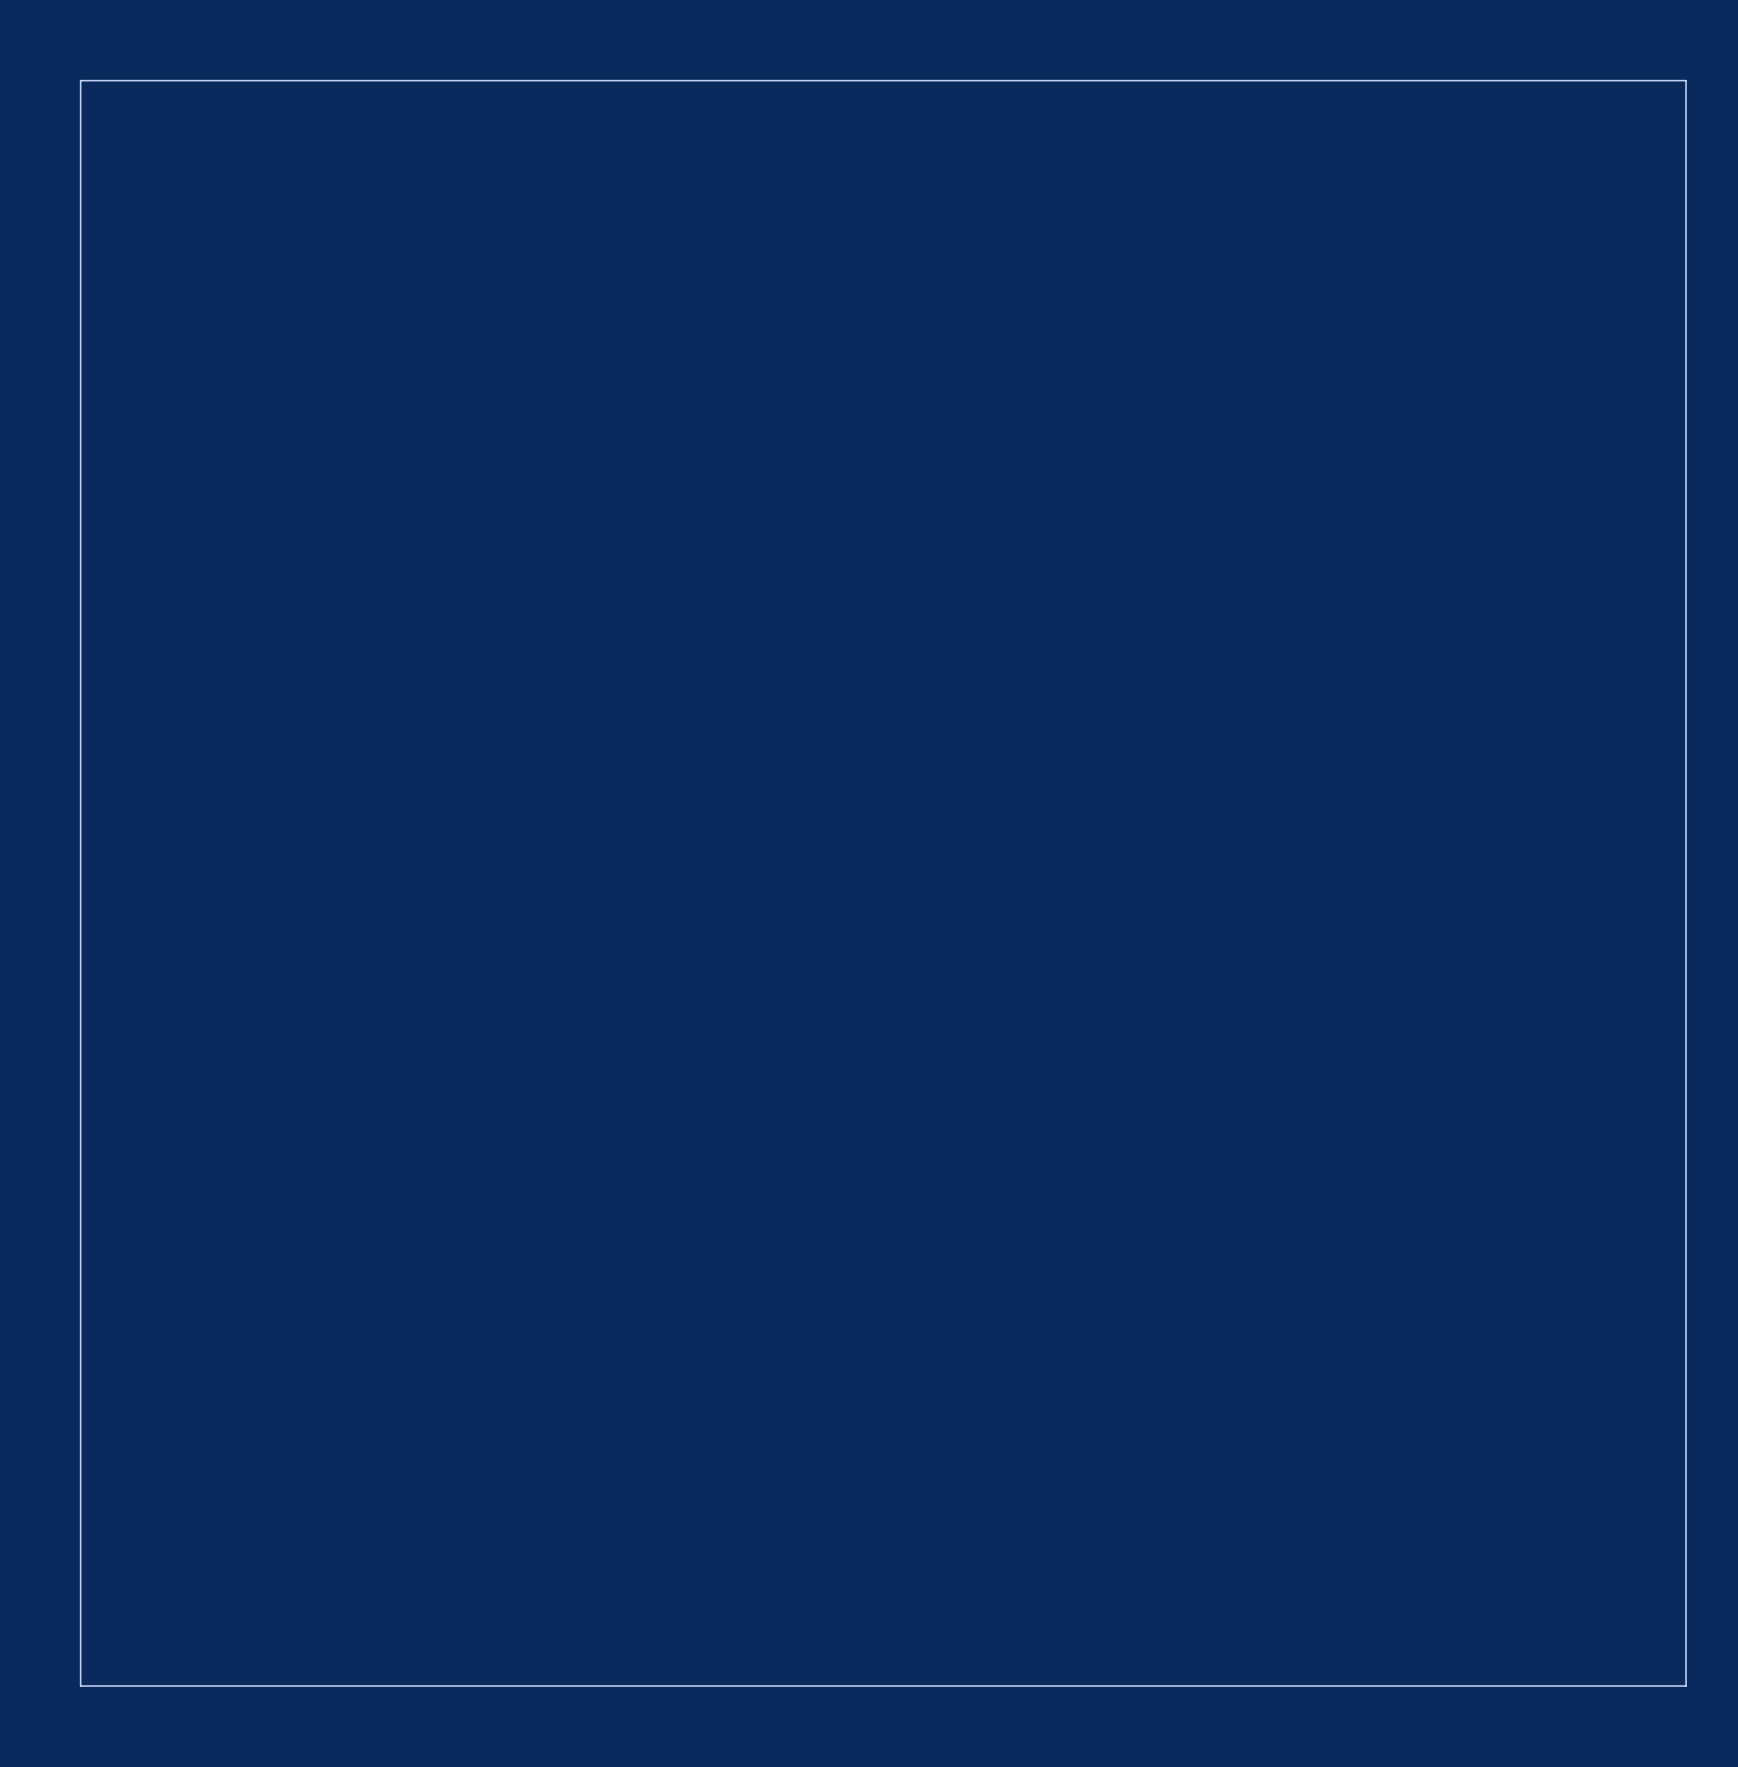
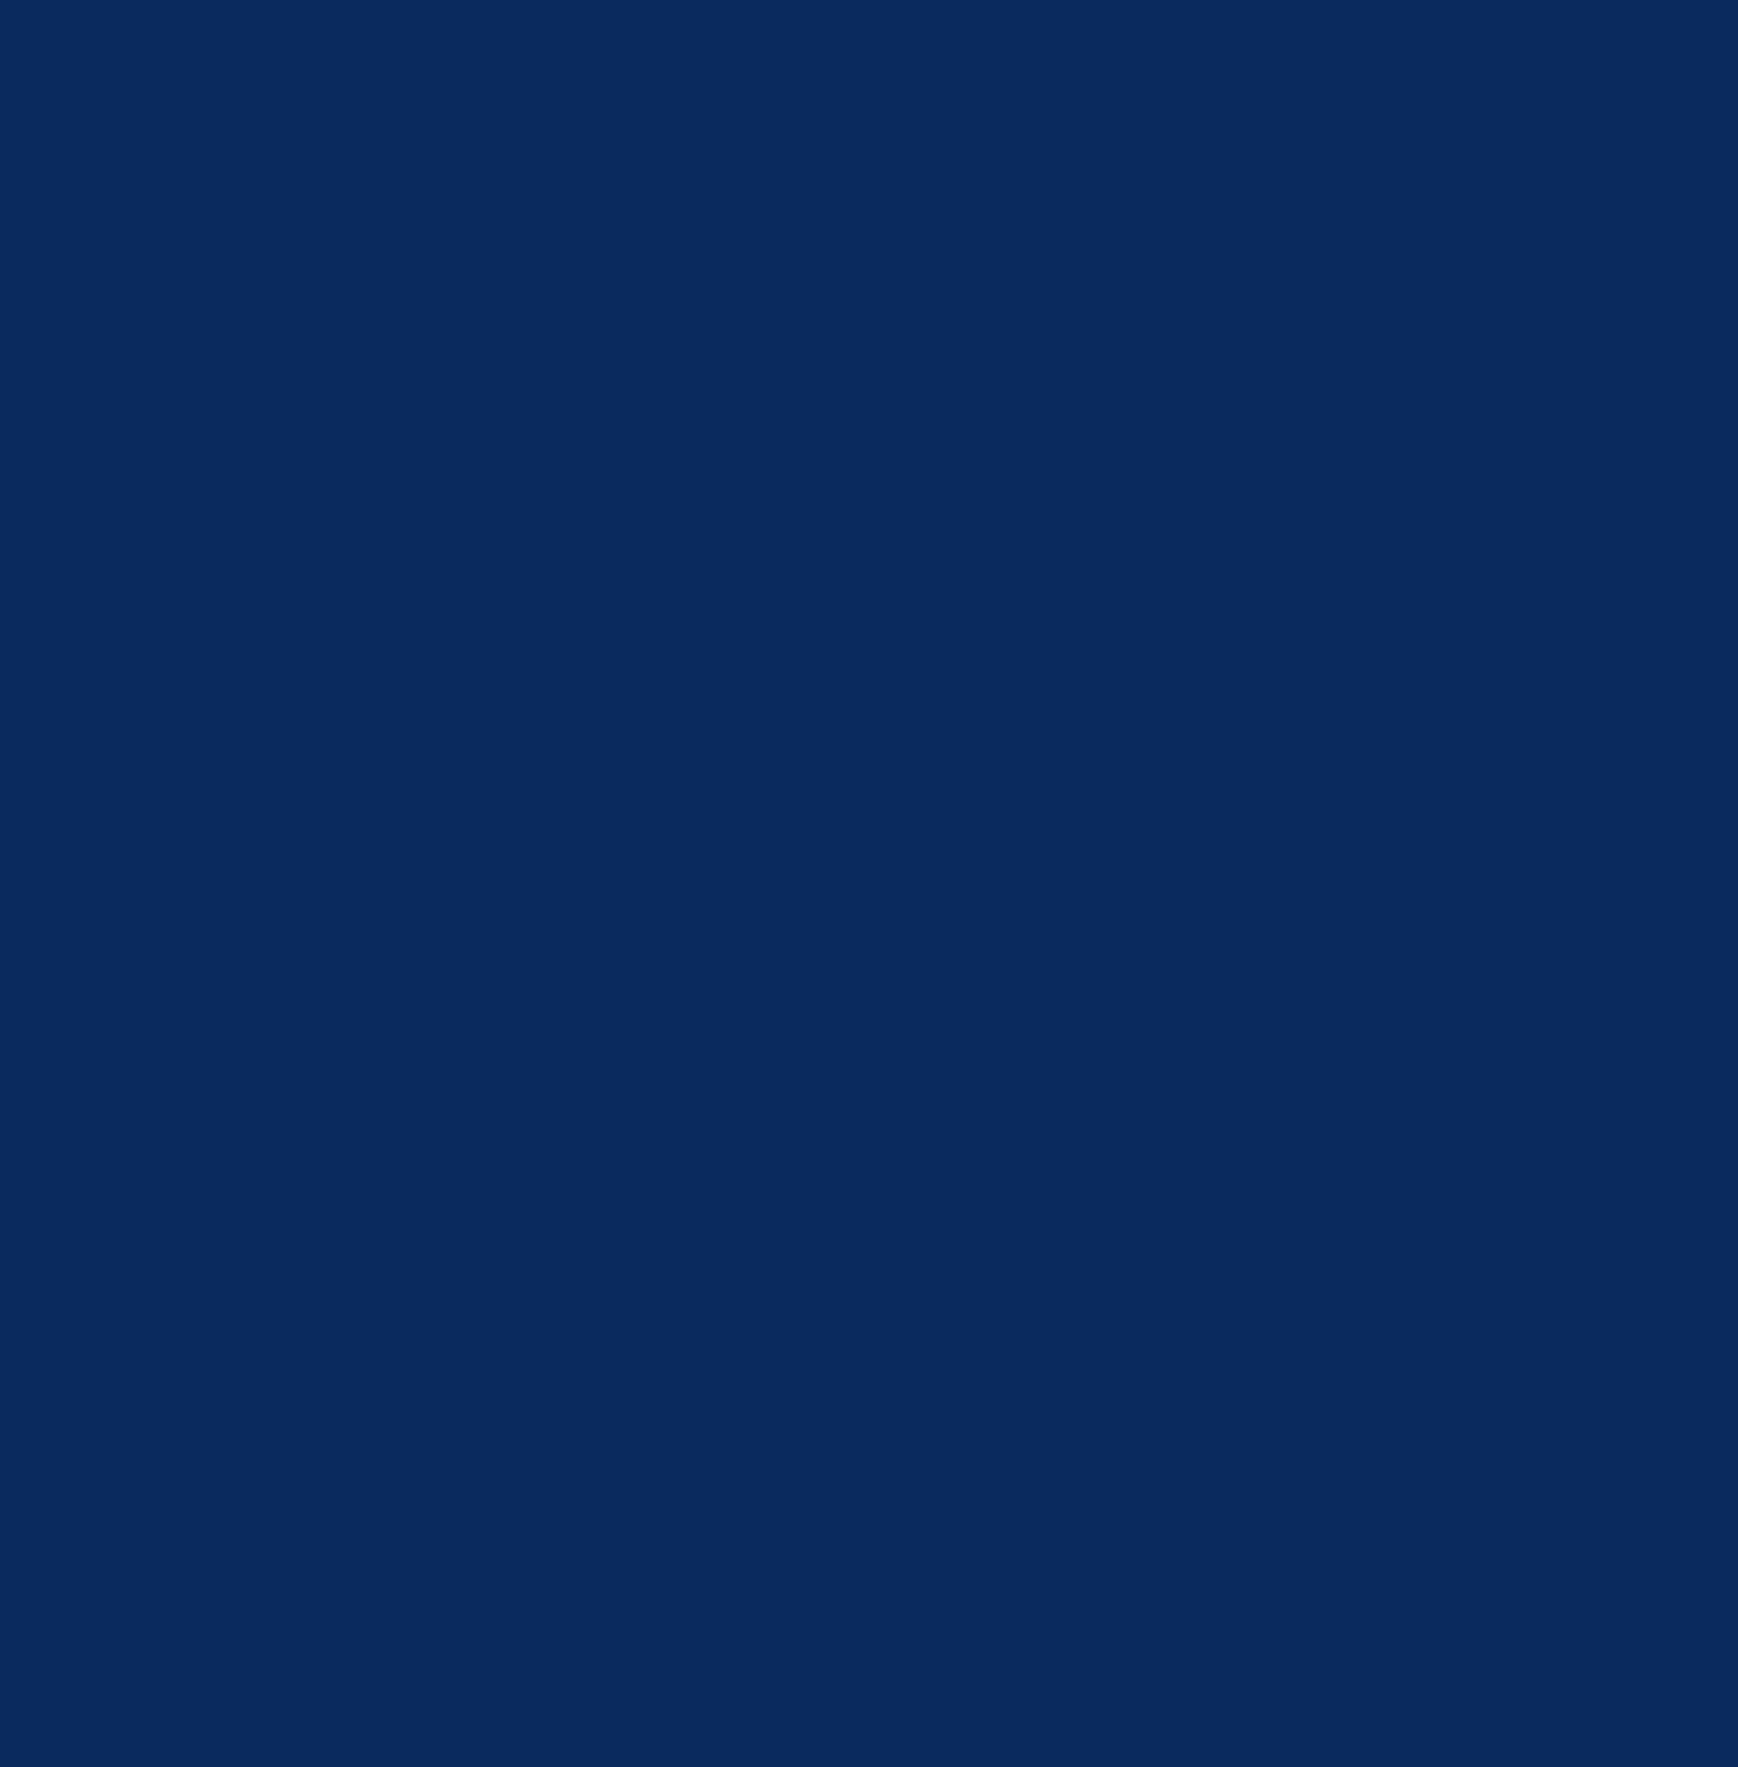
board edge: (80, 80) (80, 1686) (1686, 1686) (1686, 80) (80, 80) -> none

